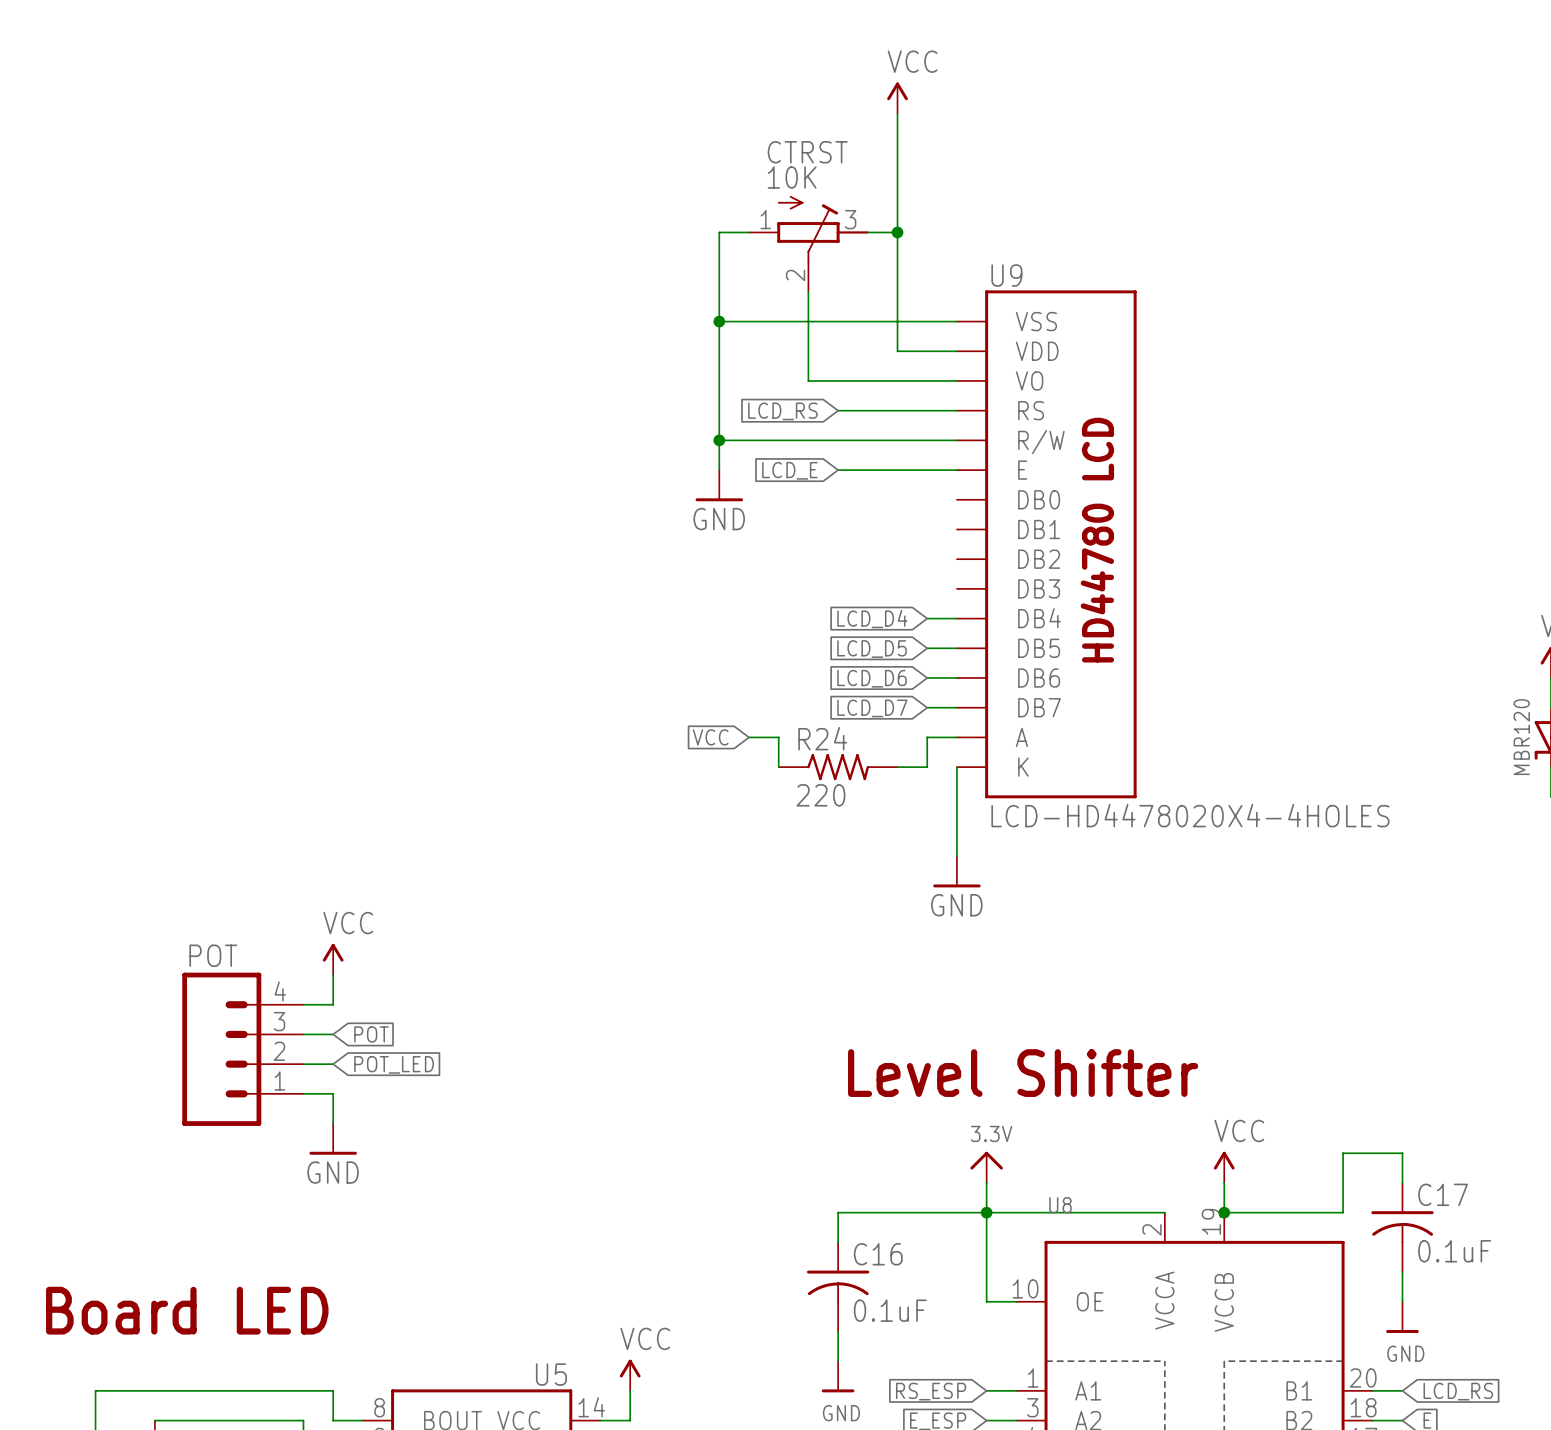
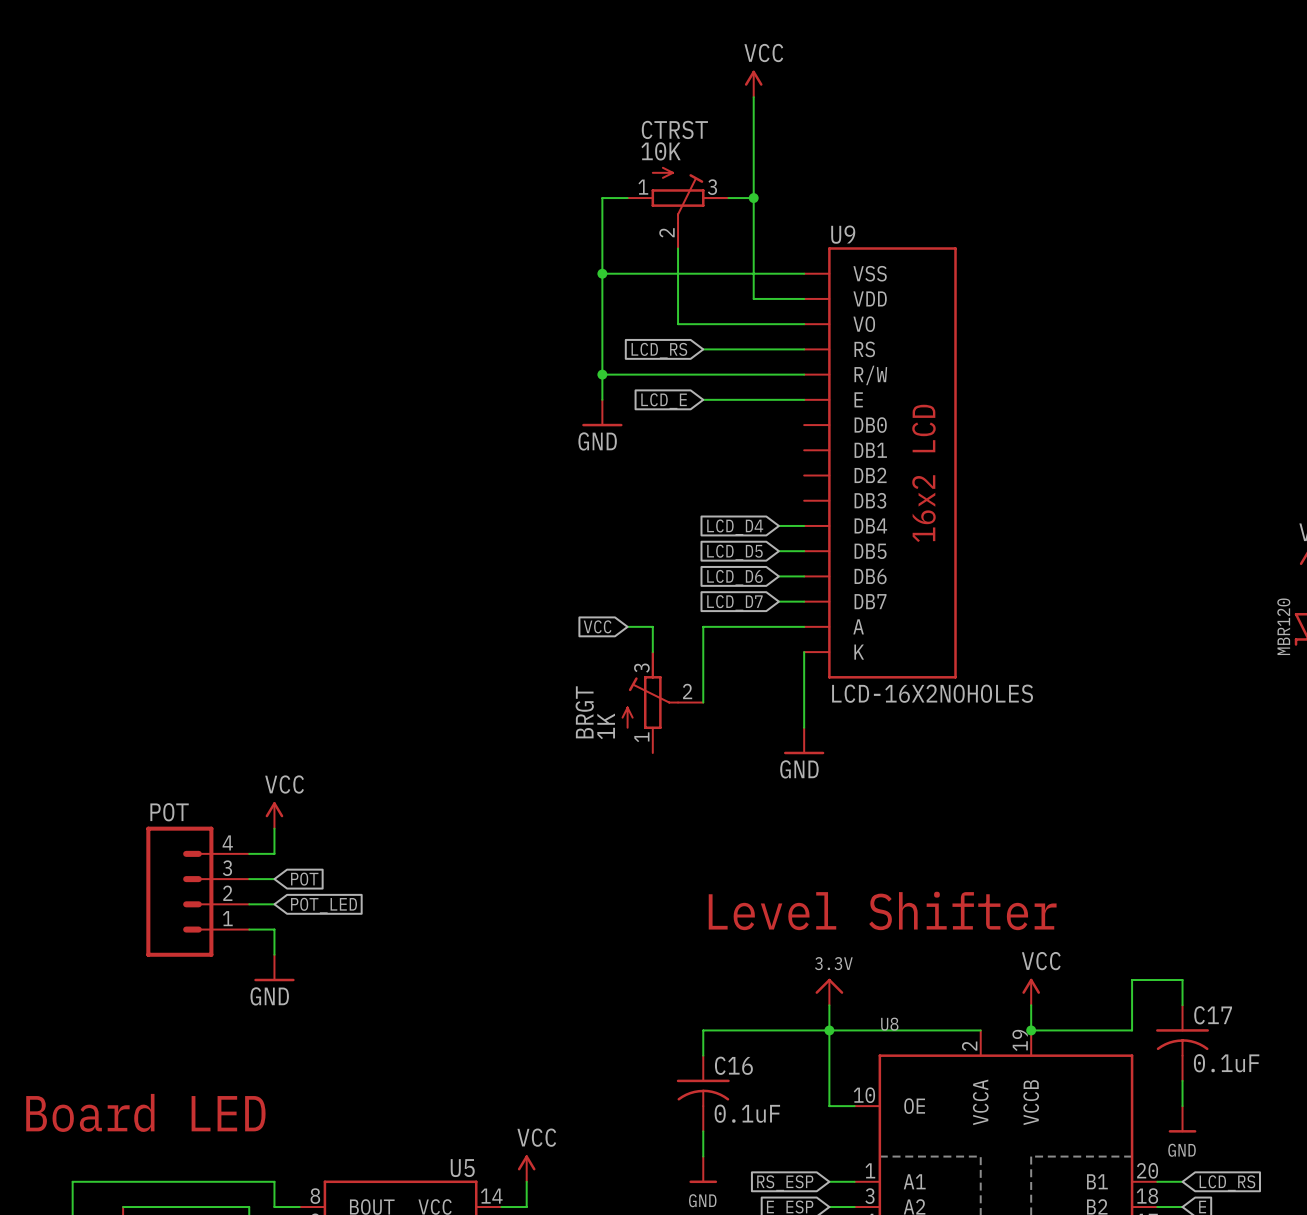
U9 text: HD44780 LCD (1097, 540) -> none
U9 text: none -> 16x2 LCD (923, 473)
wire: (927, 737) (927, 767) (897, 767) -> (778, 626) (703, 626) (703, 702)
R24: 220 (838, 767) -> none
U9 value: LCD-HD4478020X4-4HOLES (1190, 815) -> LCD-16X2NOHOLES (932, 693)
BRGT: none -> 1K (662, 702)

